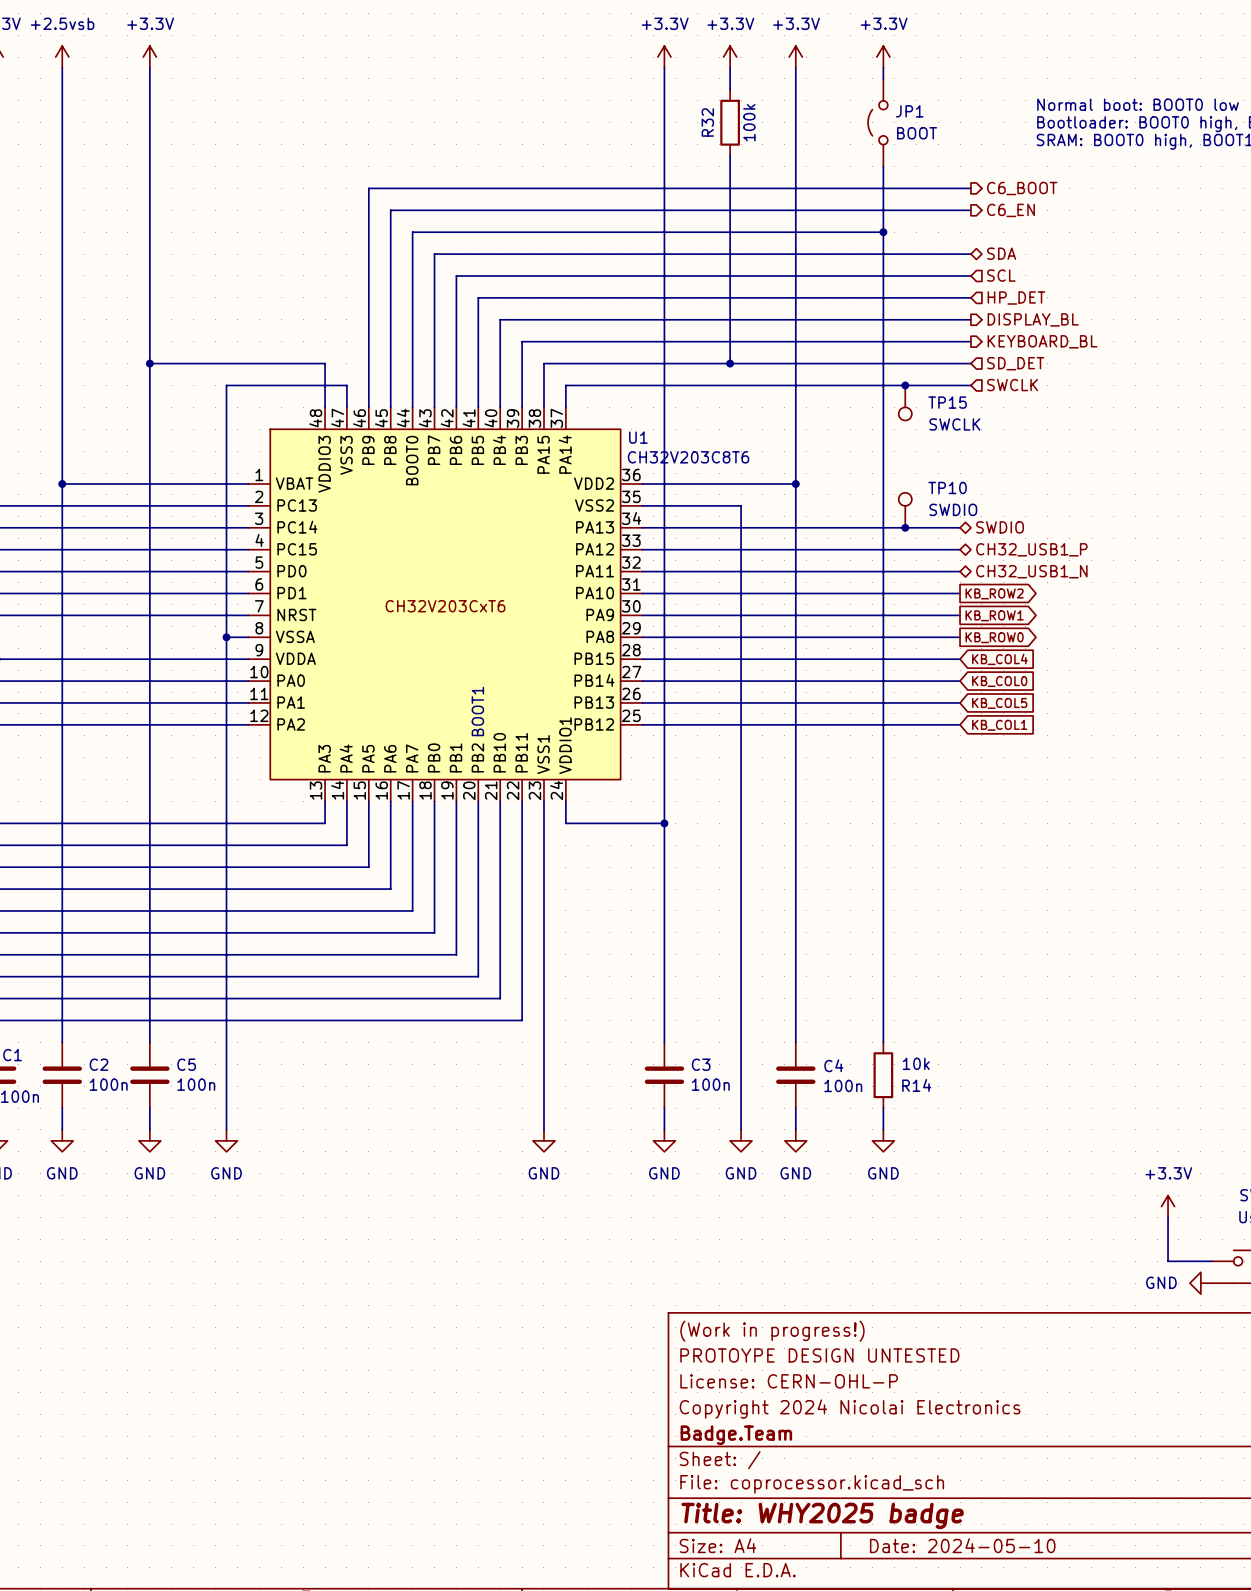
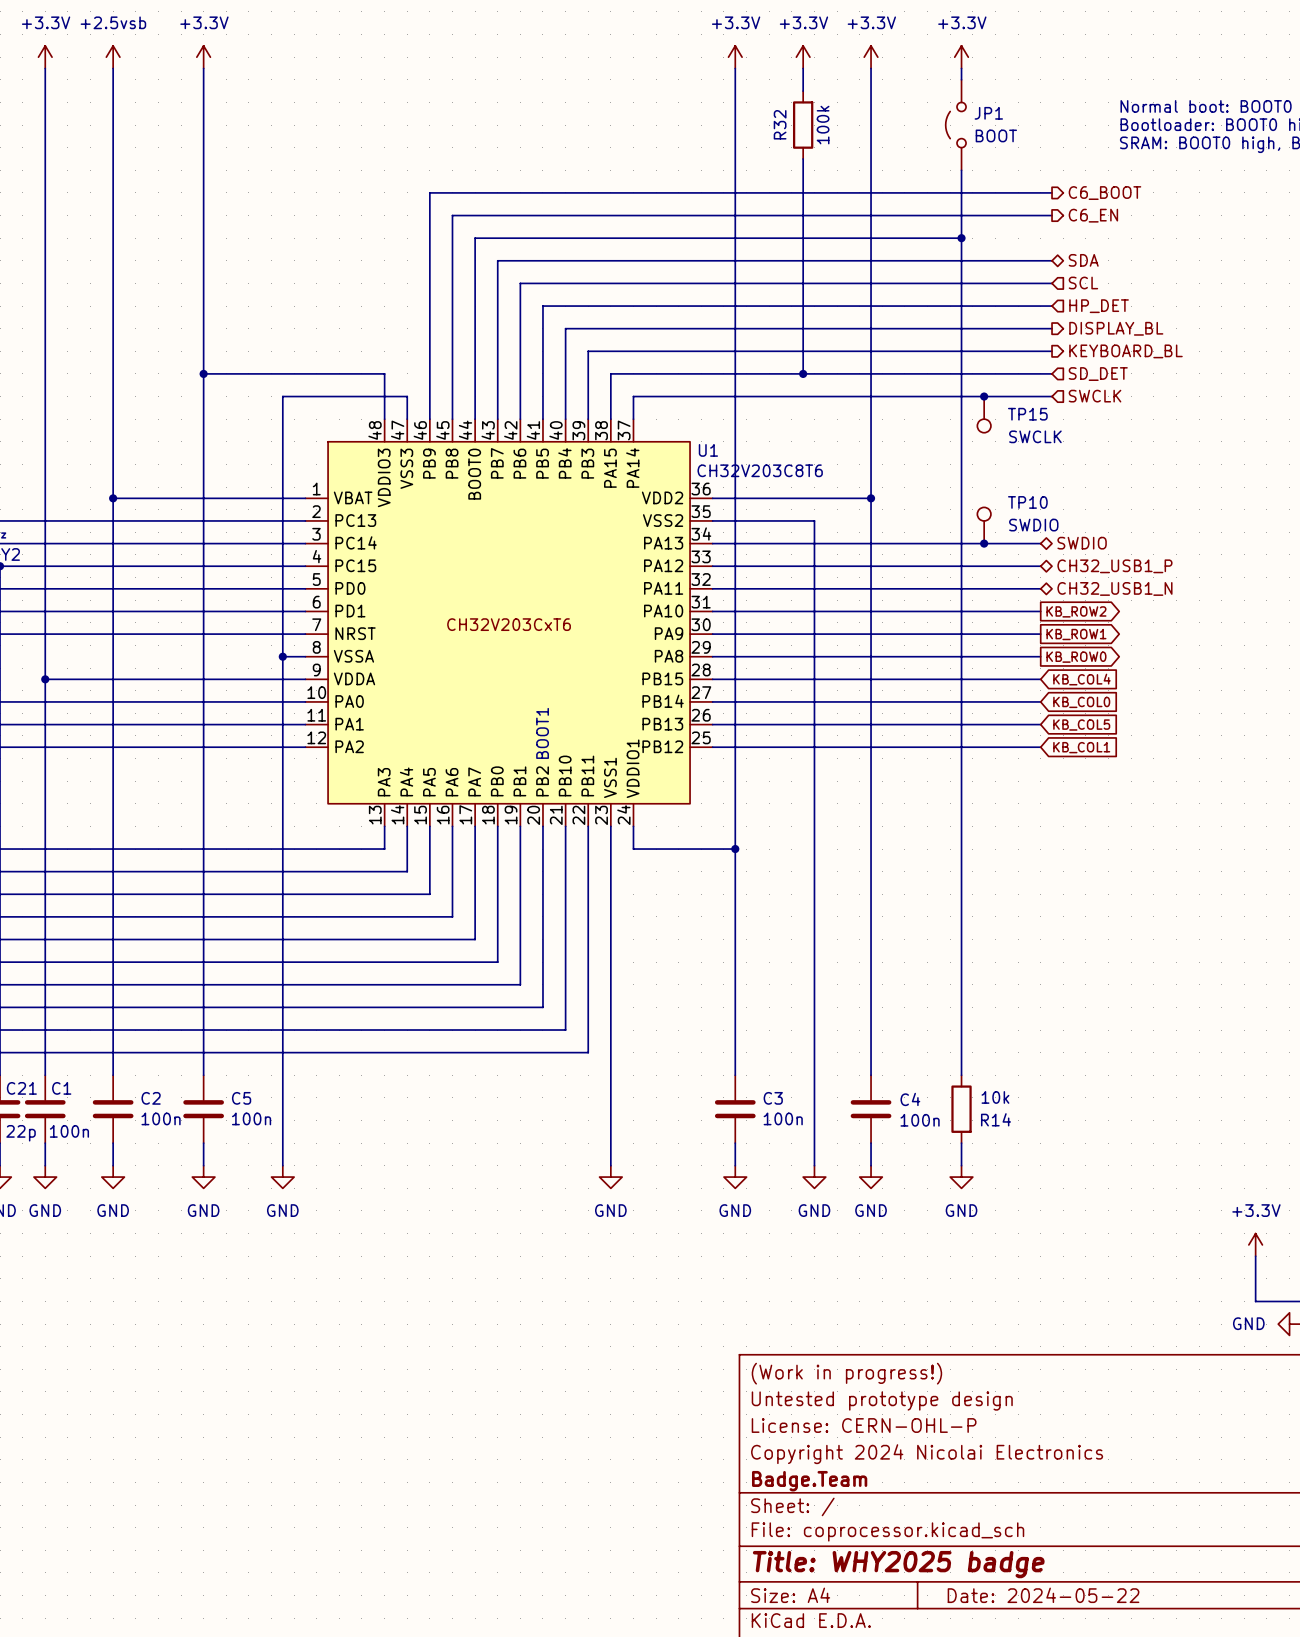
title block: PROTOYPE DESIGN UNTESTED (819, 1355) -> Untested prototype design (882, 1401)
title block: Date: 2024-05-10 (962, 1545) -> Date: 2024-05-22 (1043, 1595)

